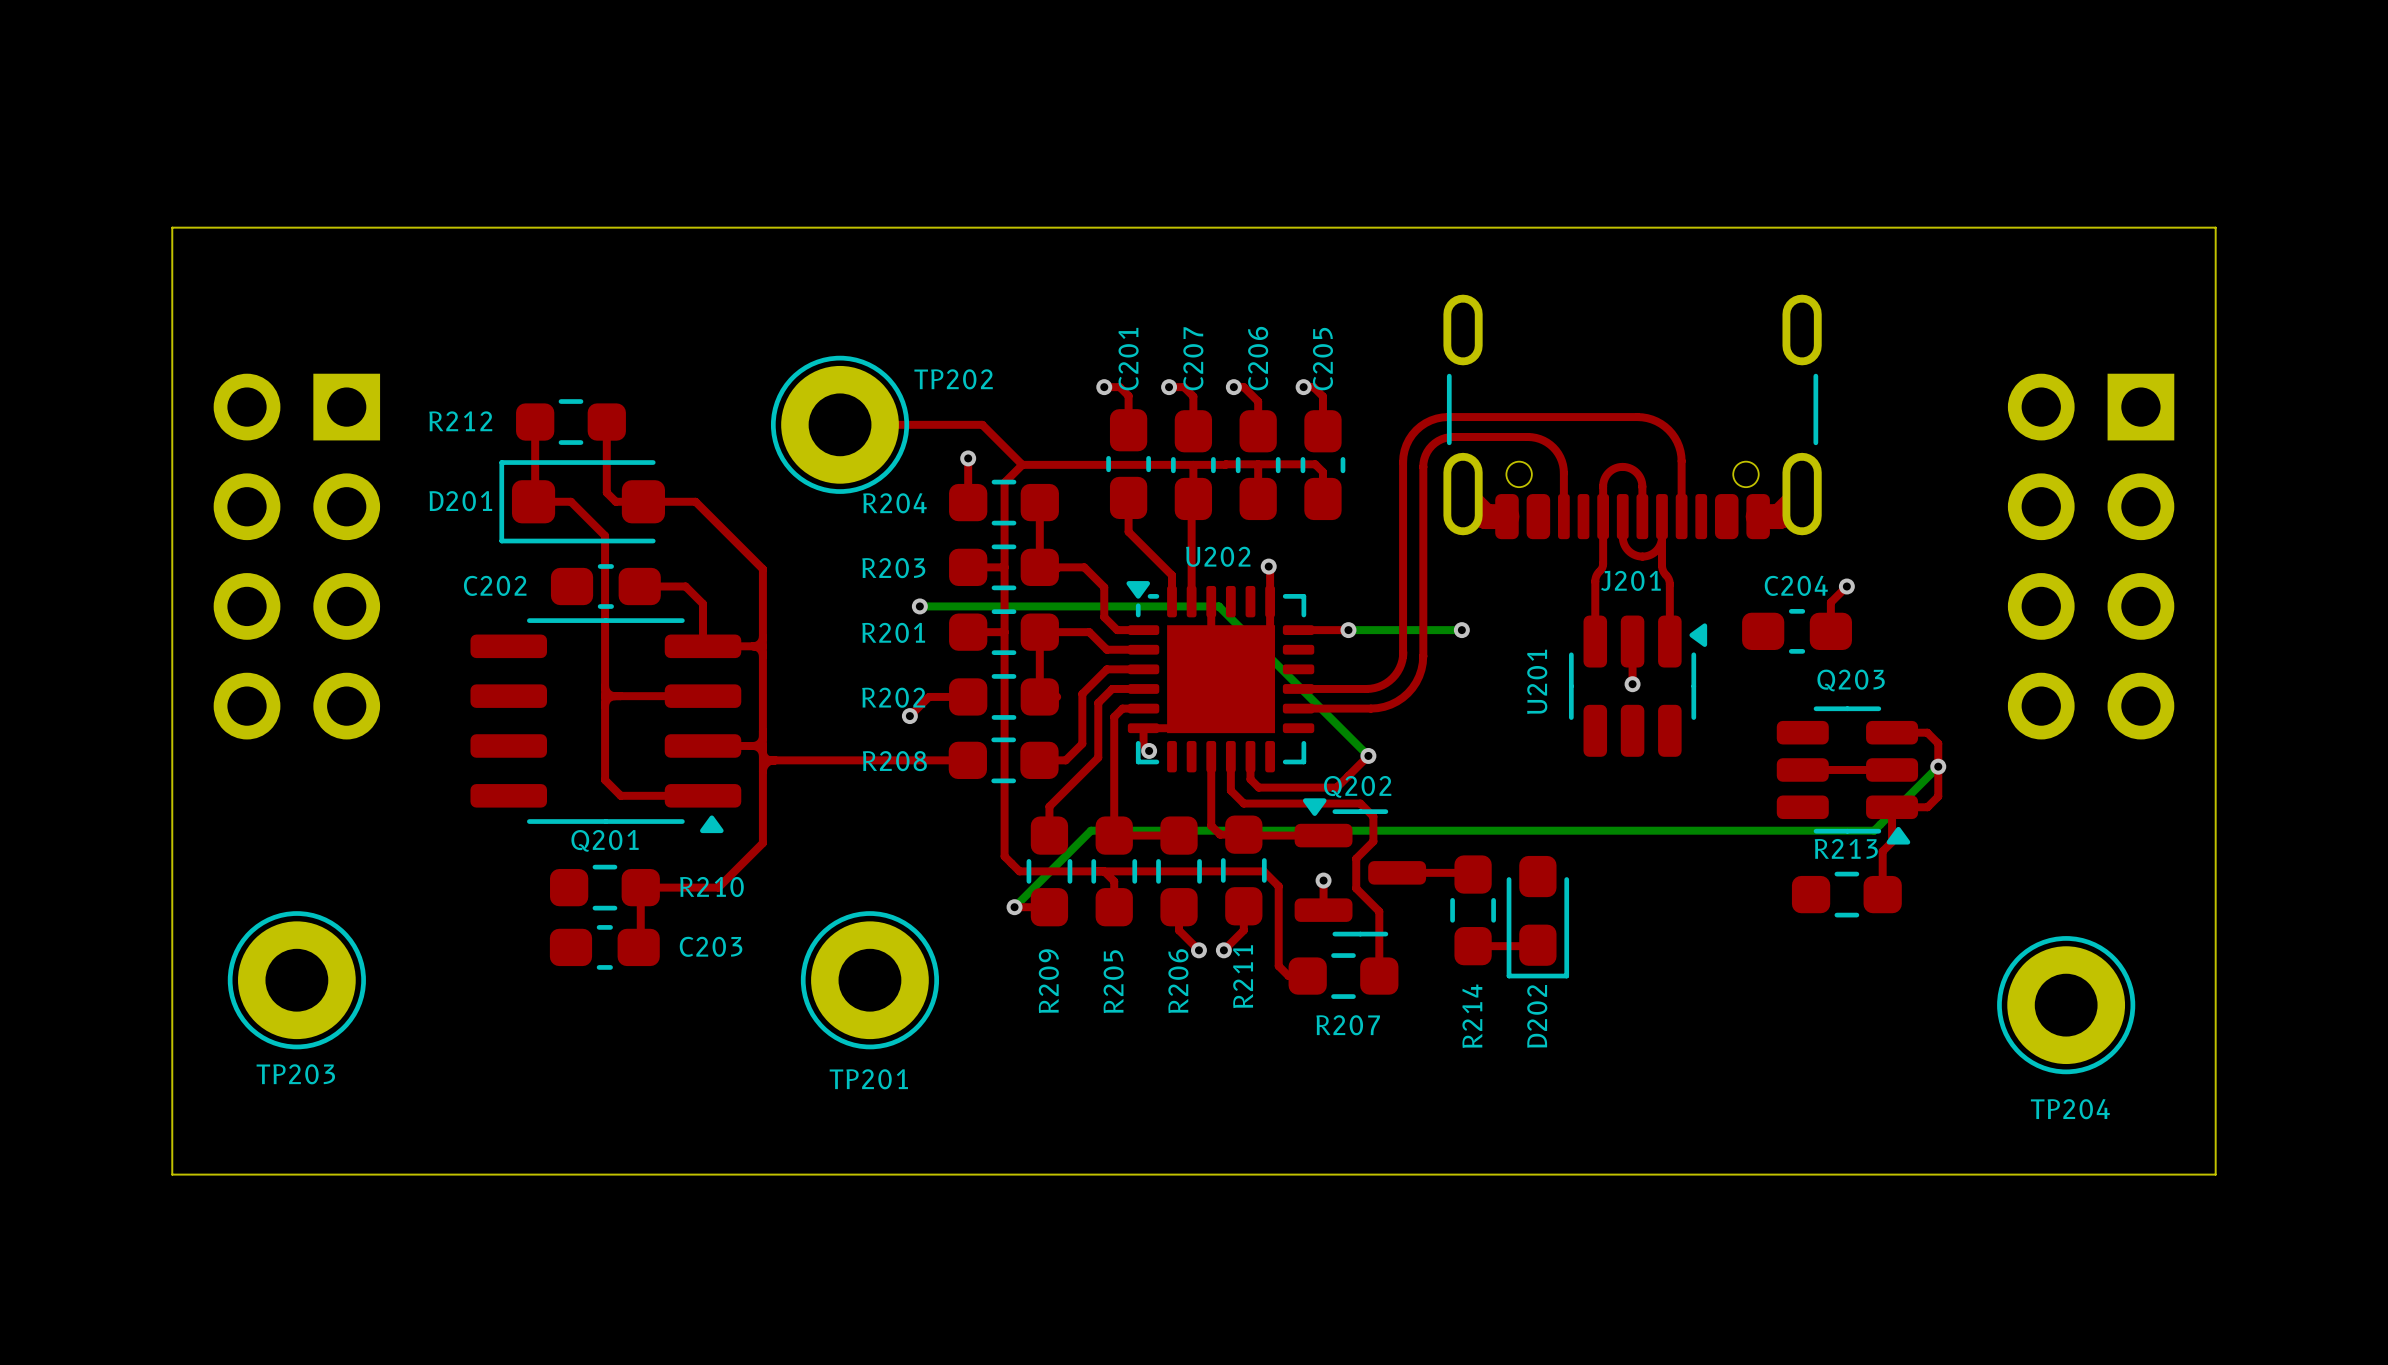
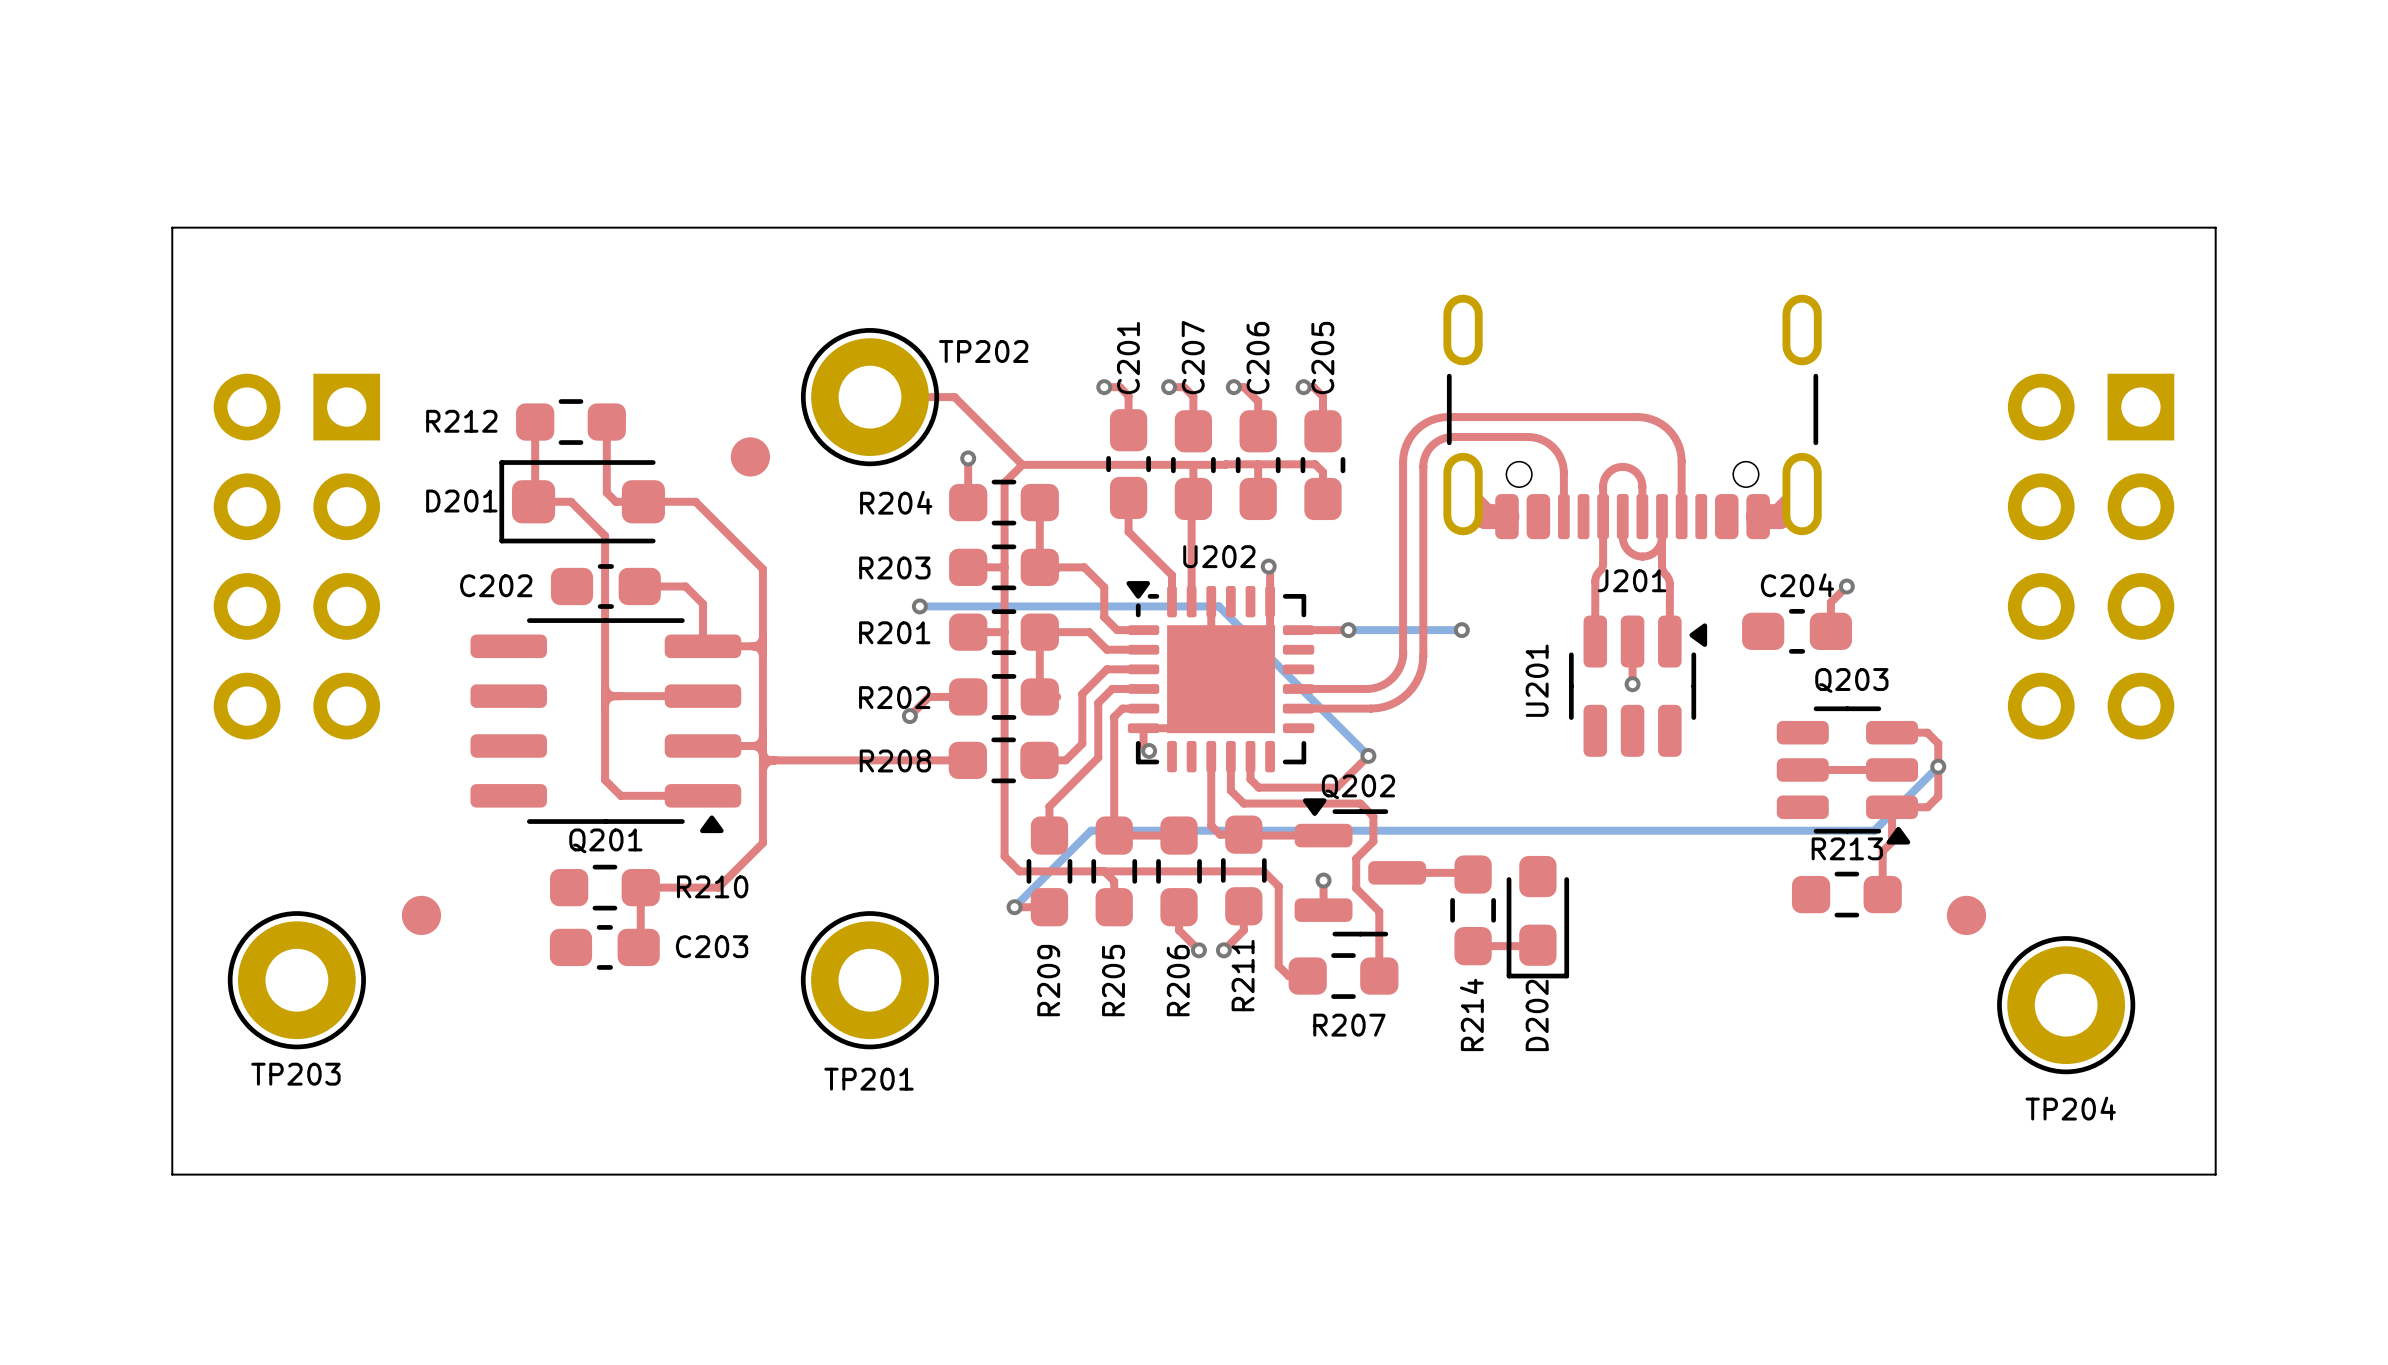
top track: (820, 424) (982, 424) -> (870, 397) (954, 397) (982, 424)
TP202 position: (840, 424) -> (870, 397)
part: none -> (750, 456)
part: none -> (421, 915)
part: none -> (1966, 915)

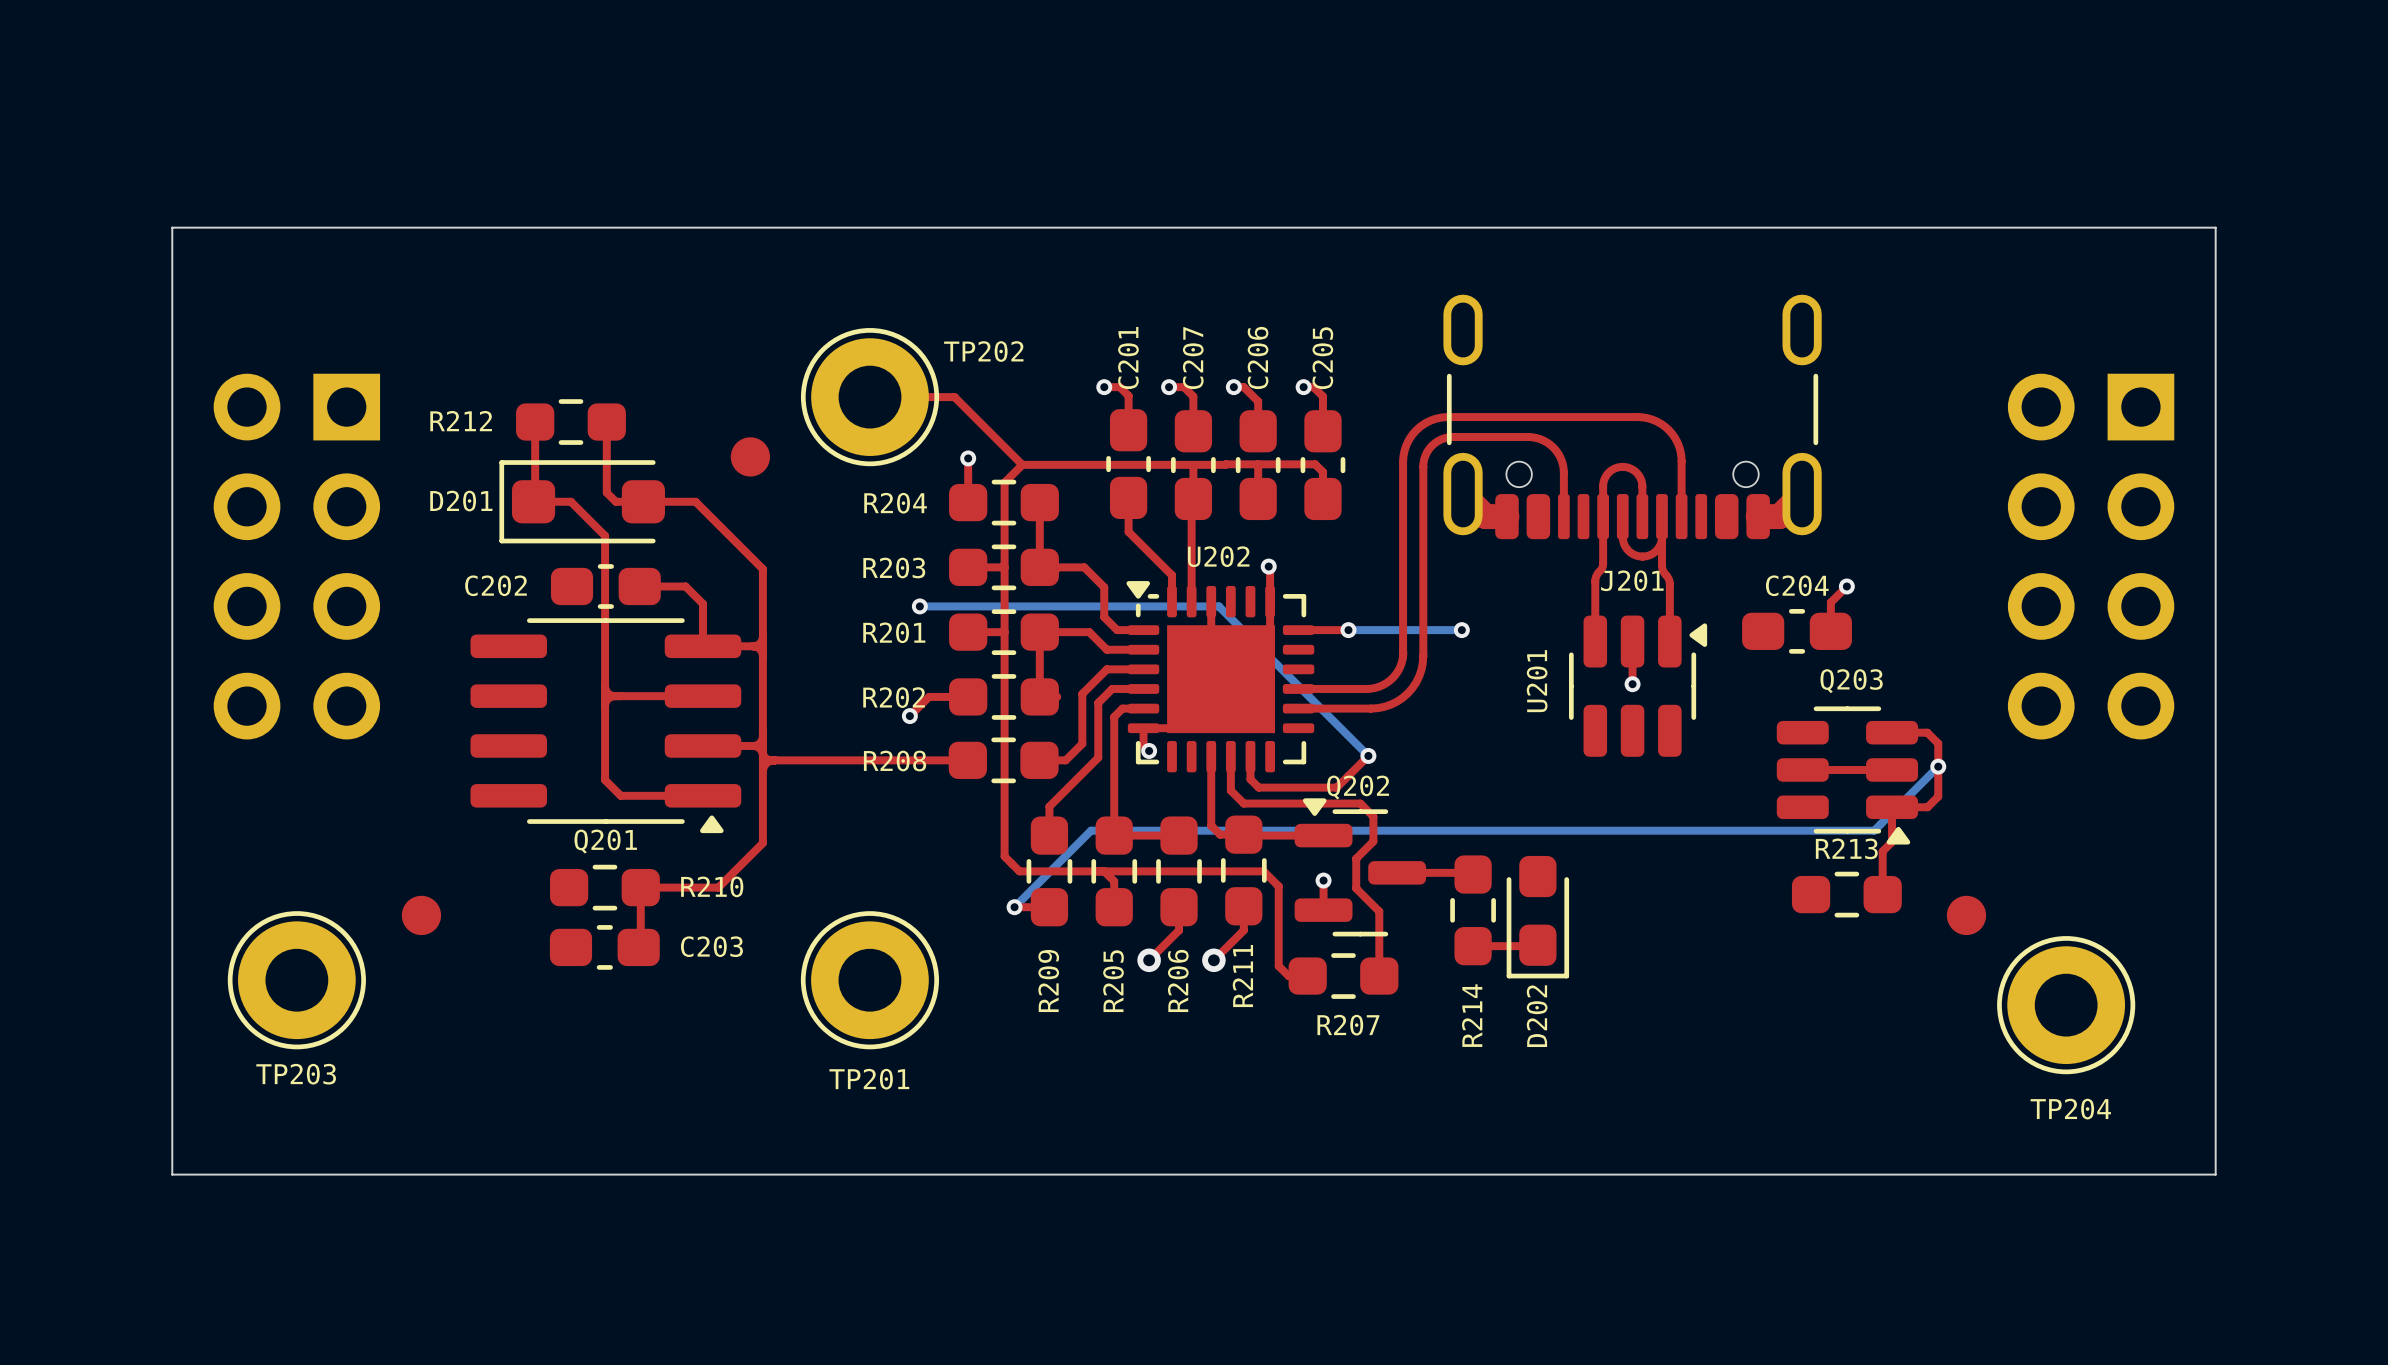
top track: (1179, 930) (1198, 950) -> (1179, 930) (1149, 960)
via: (1198, 950) -> none
via: (1223, 950) -> none
via: none -> (1149, 960)
via: none -> (1213, 960)

